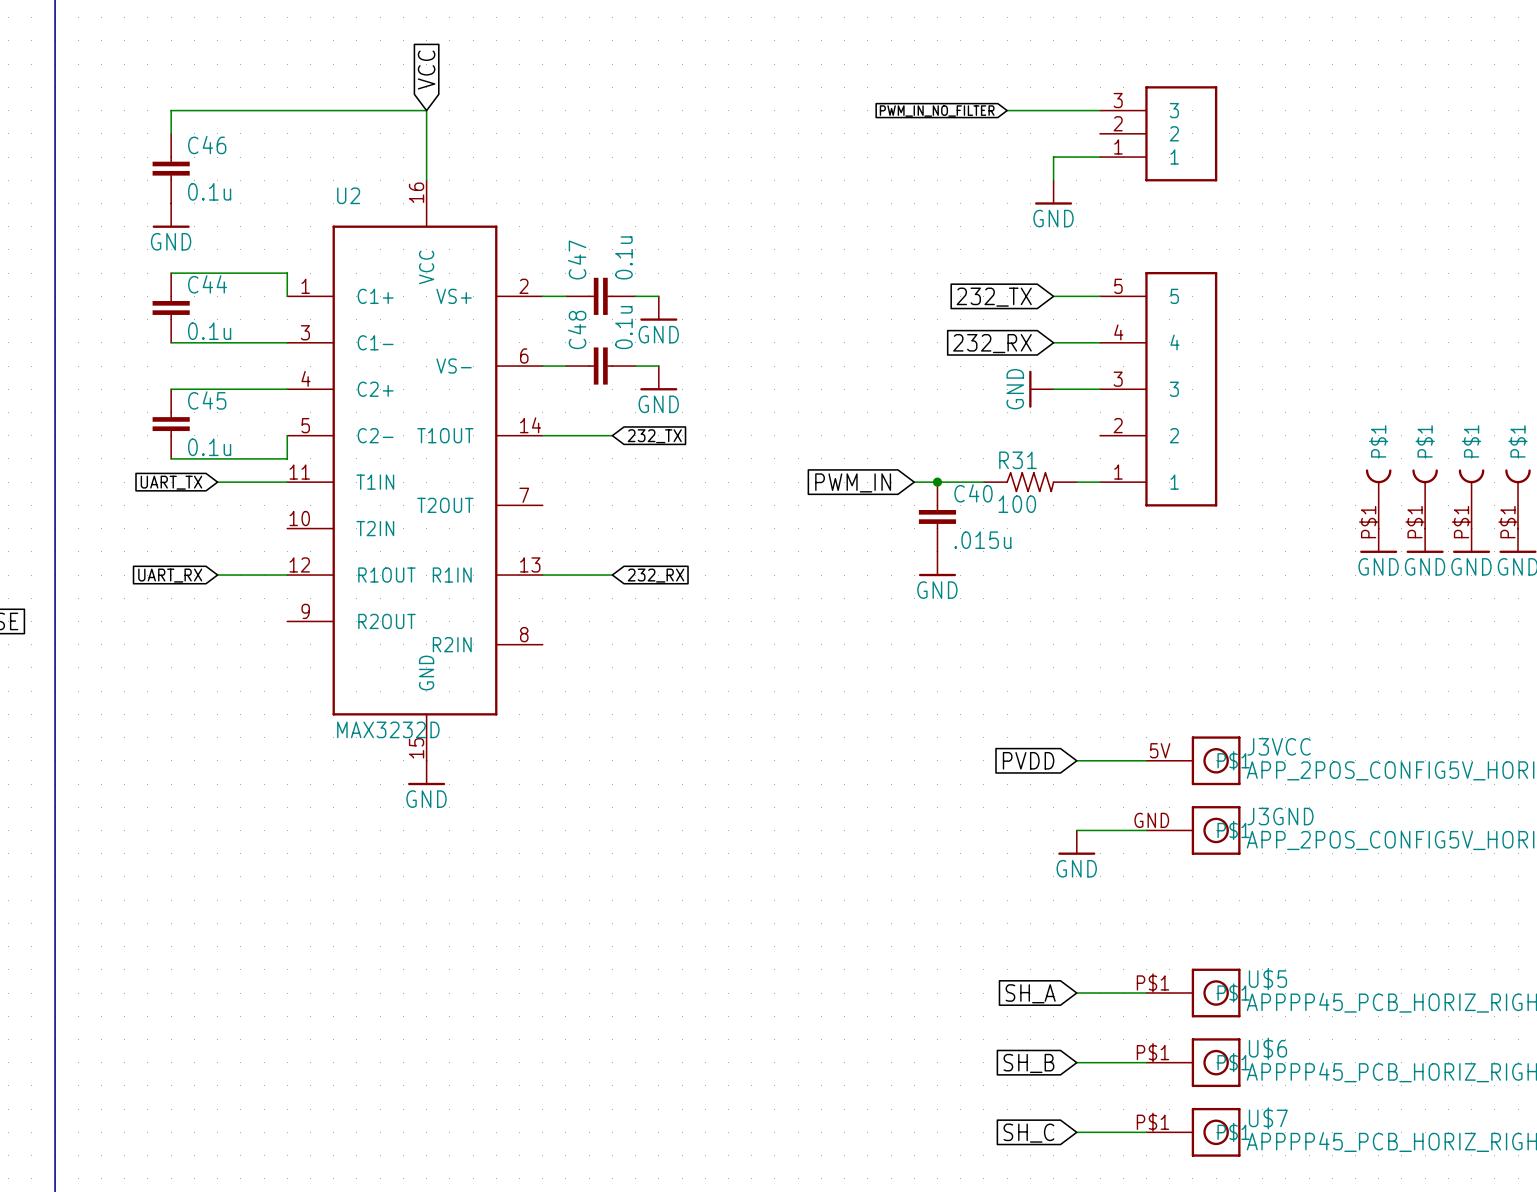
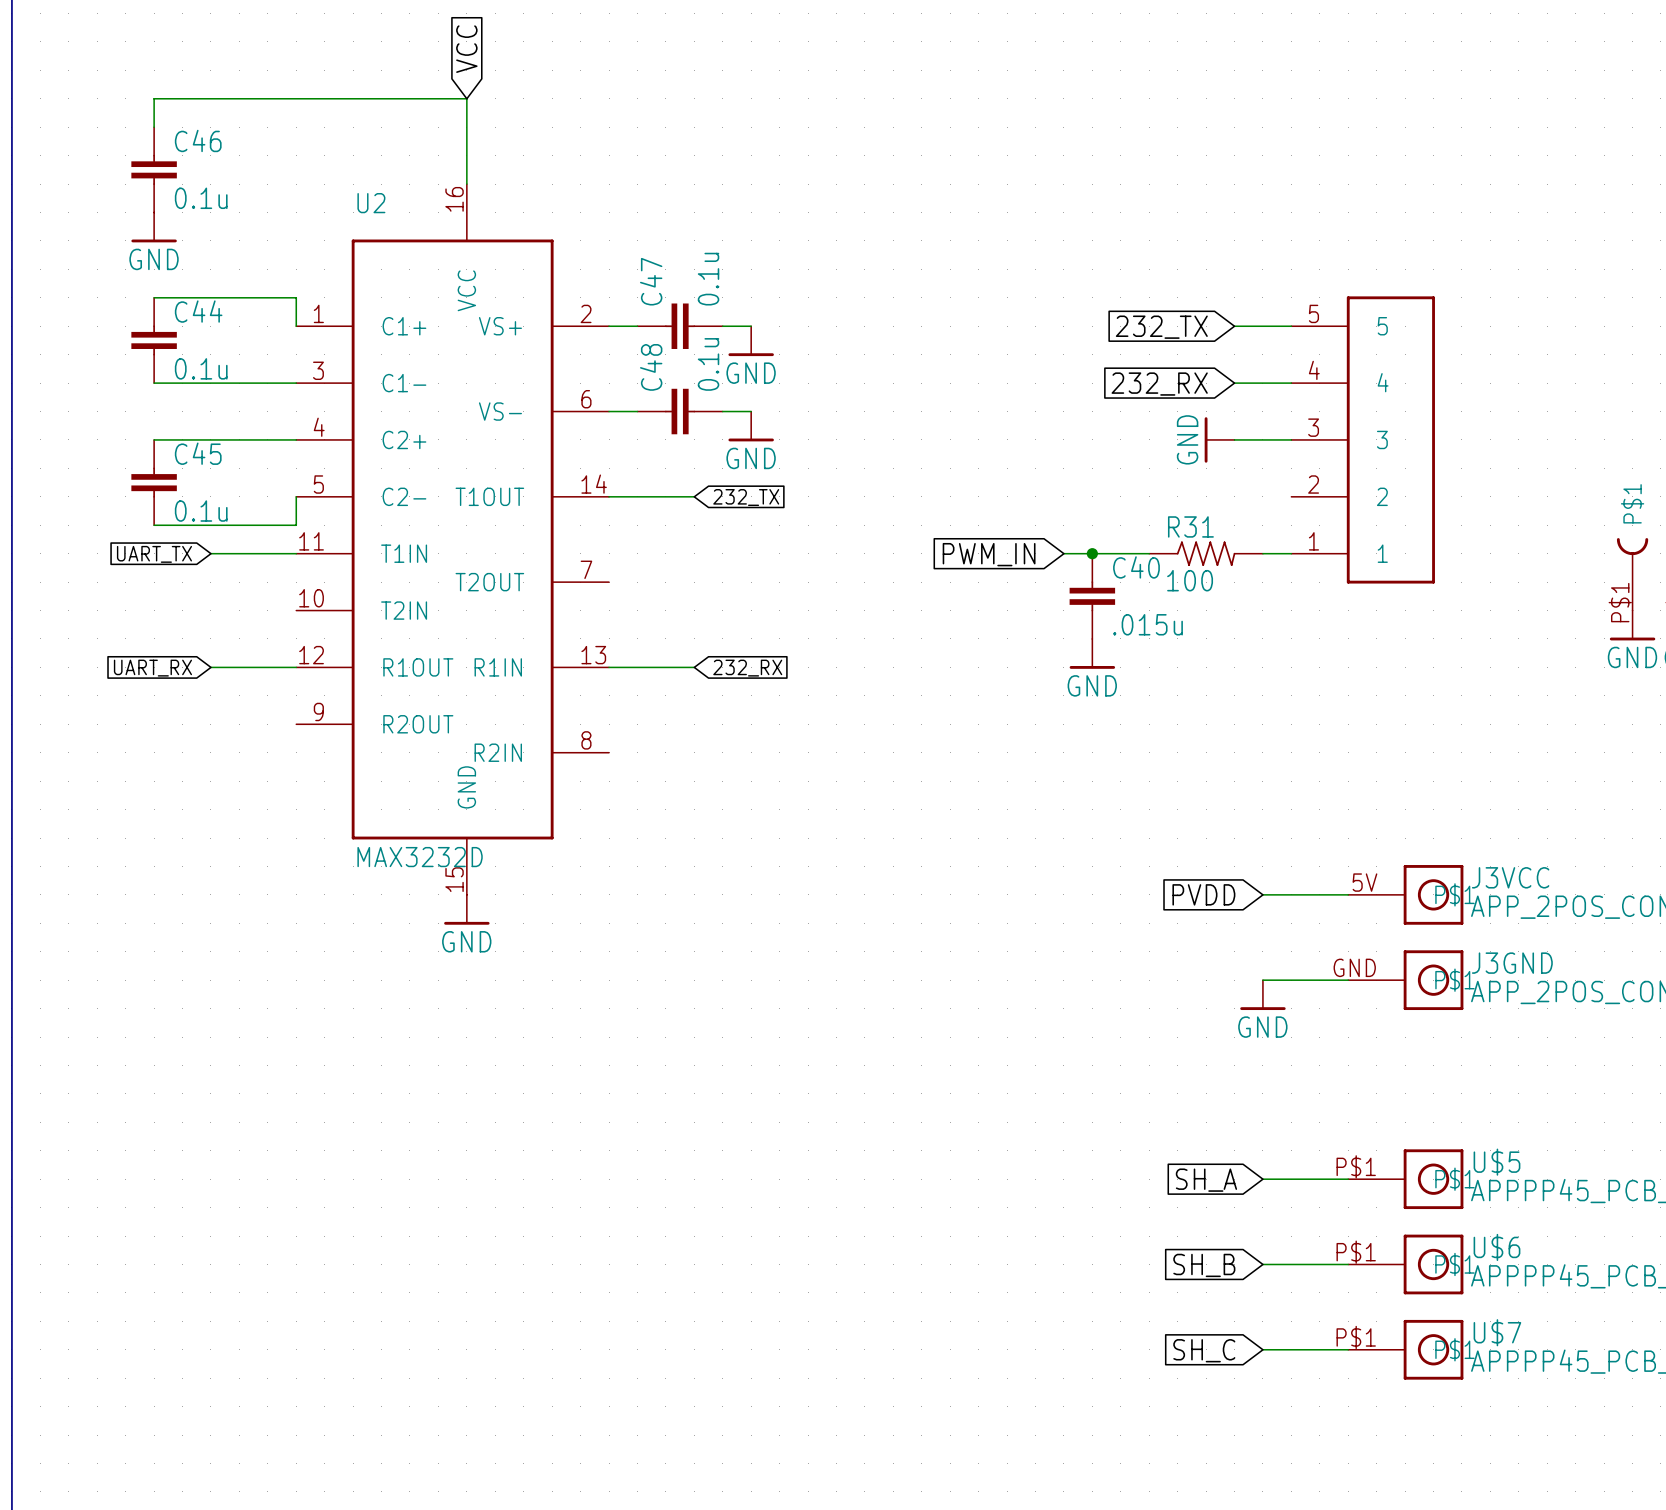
wire: (1007, 110) (1100, 110) -> none
global label: PWM_IN_NO_FILTER (937, 111) -> none
part: (1158, 133) -> none
wire: (1100, 157) (1053, 157) (1053, 180) -> none
power symbol: GND (1053, 192) -> none

